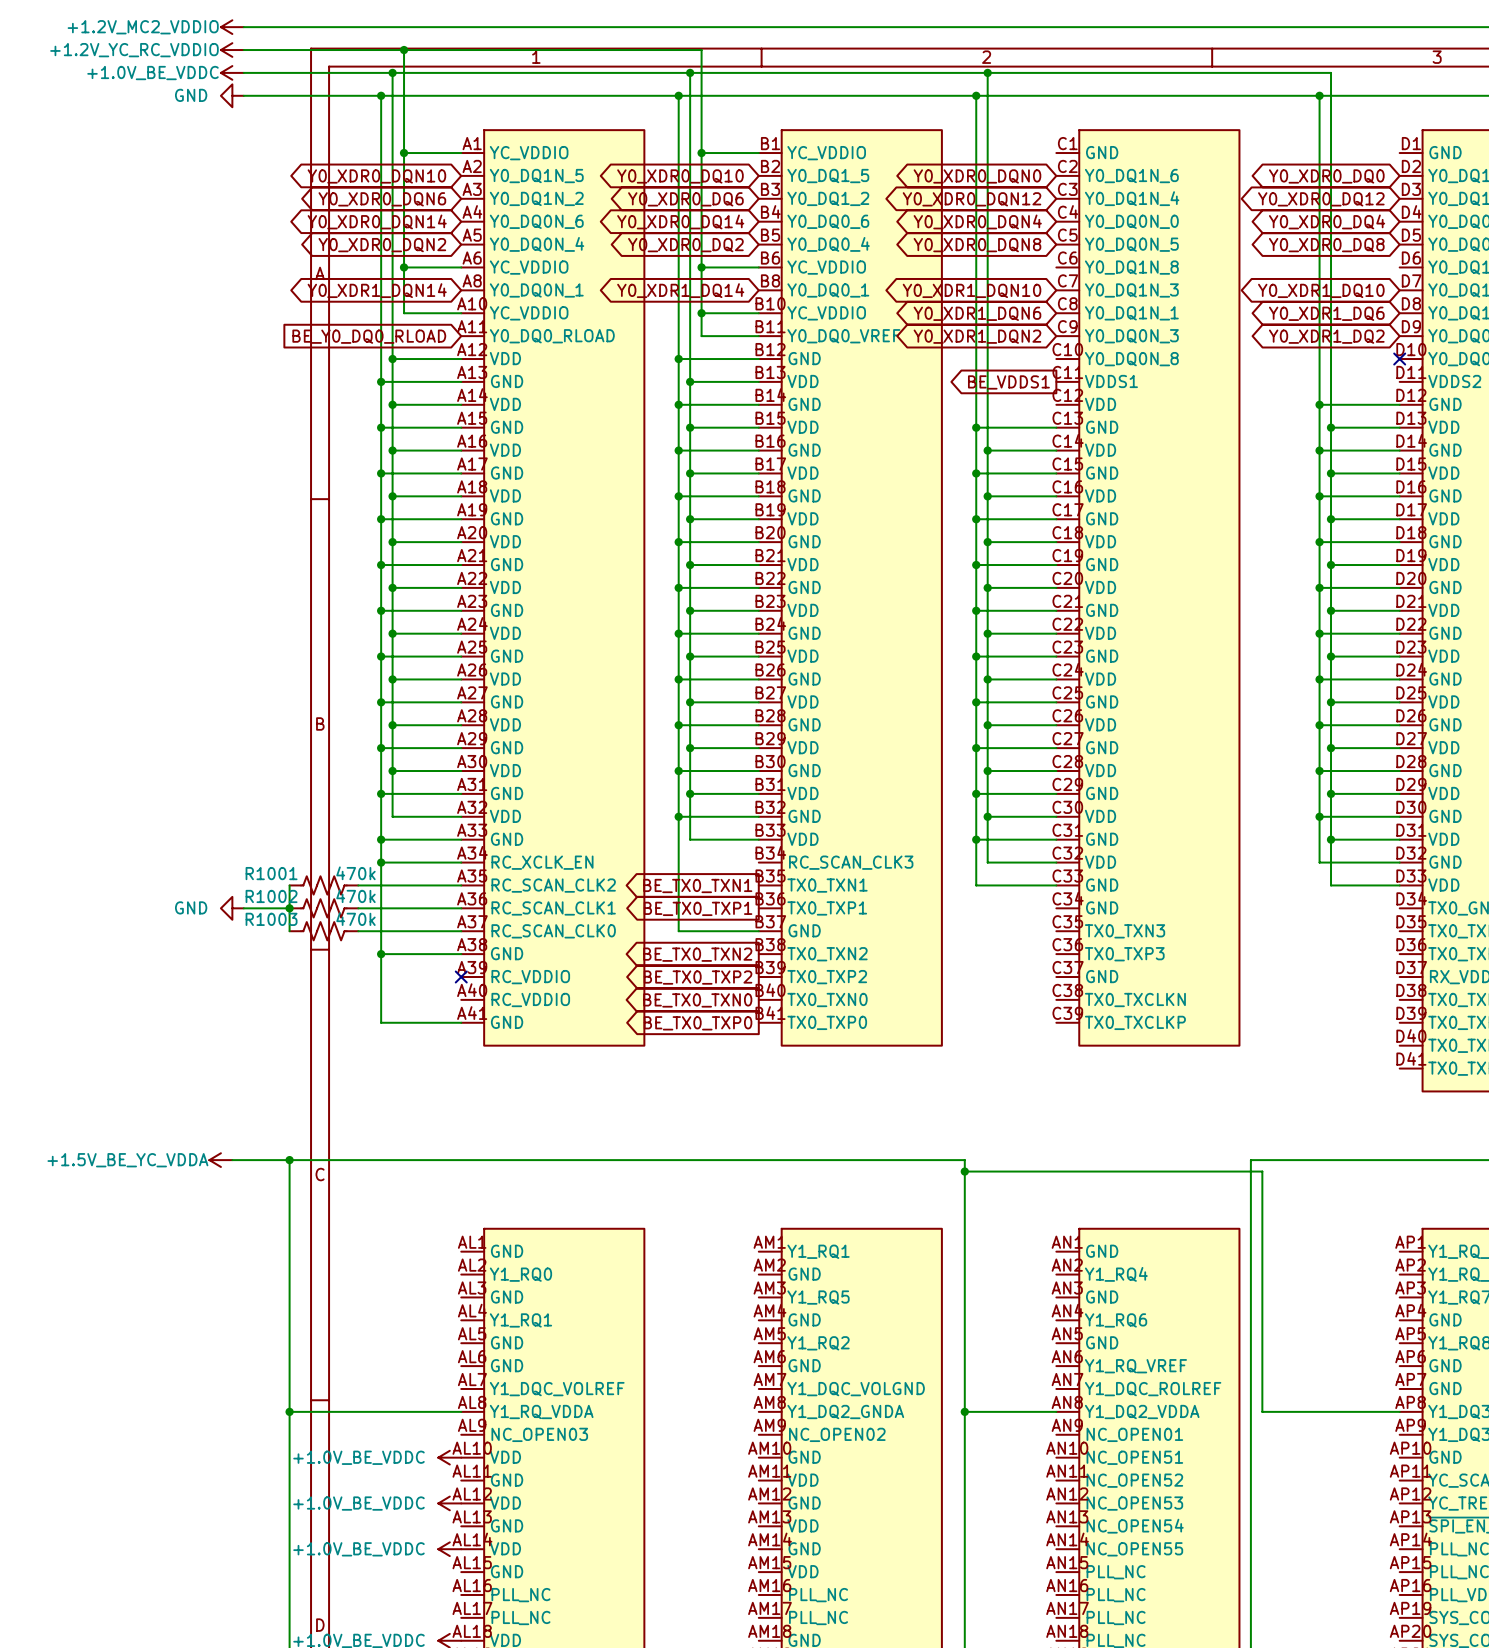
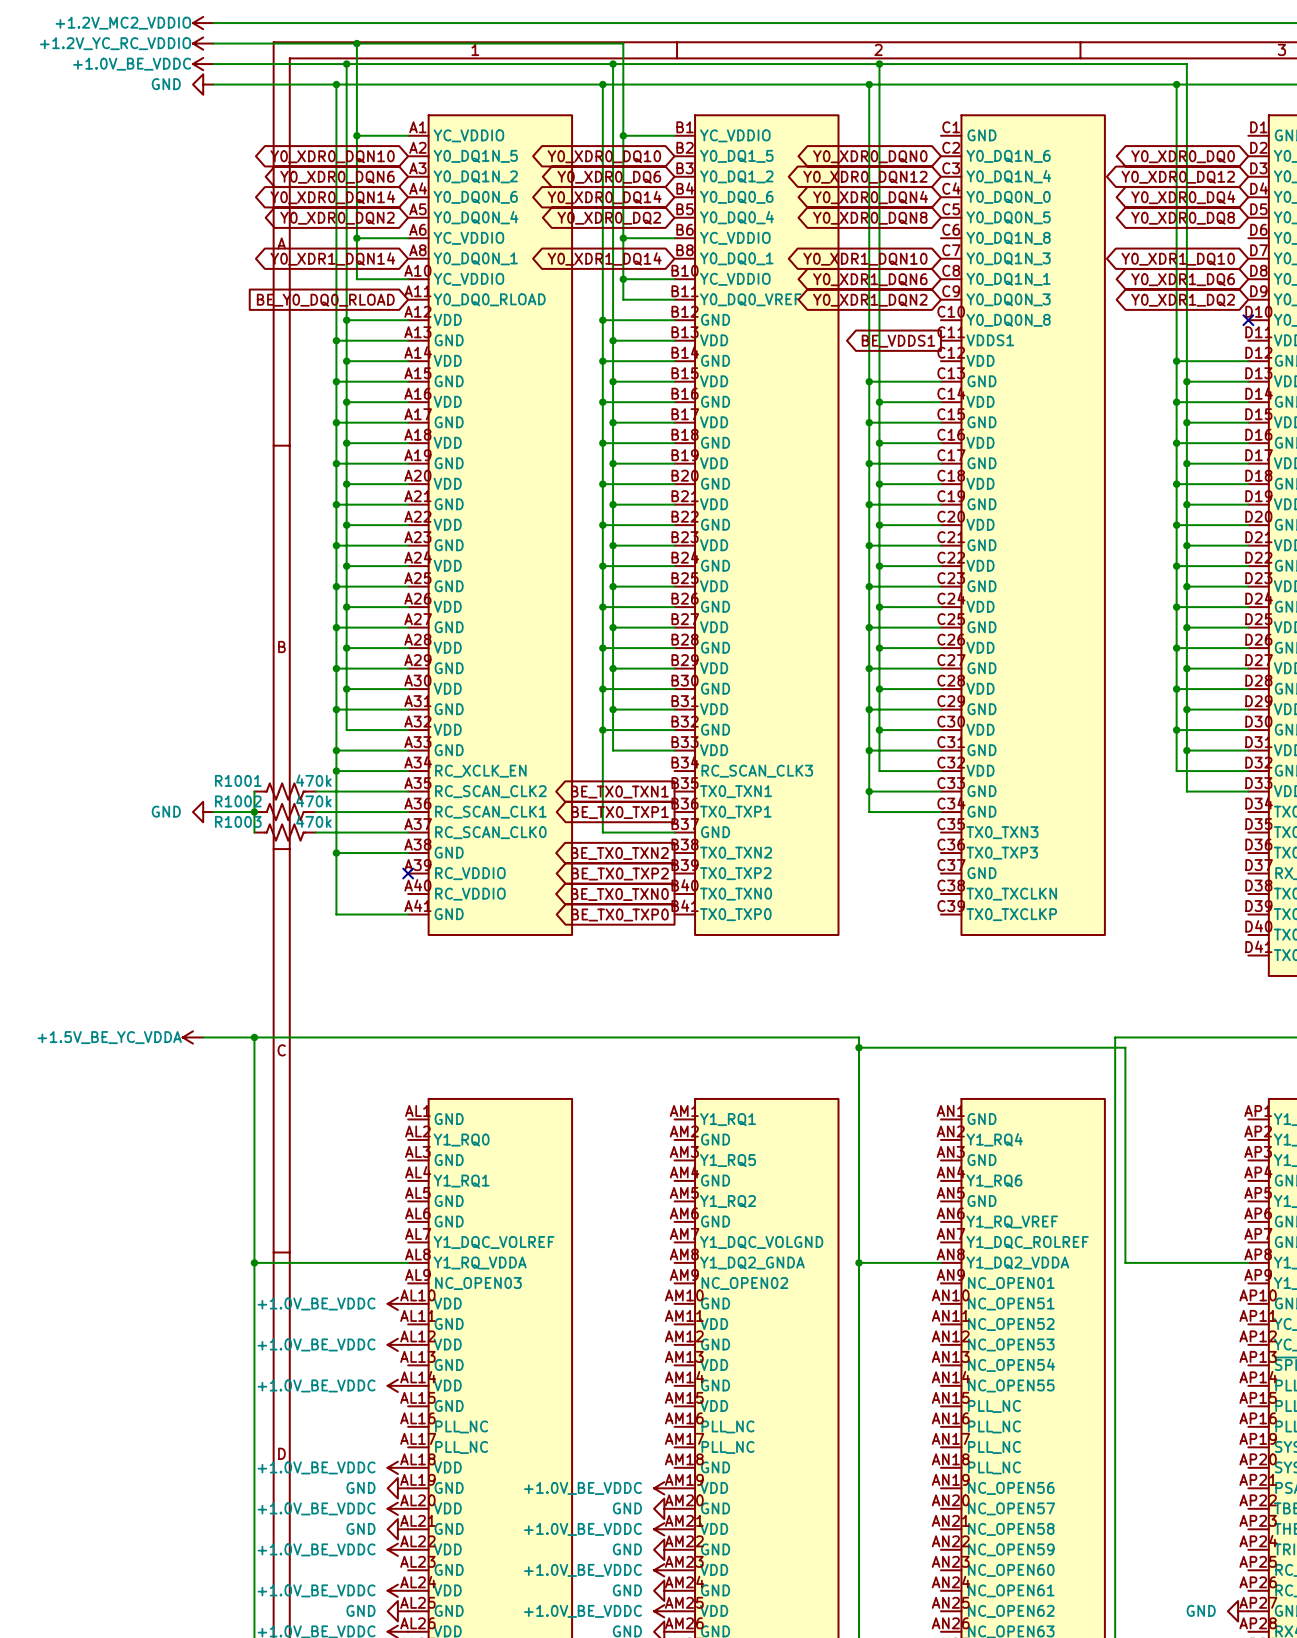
wire: none -> (869, 791) (869, 812) (940, 812)
junction: none -> (869, 791)

